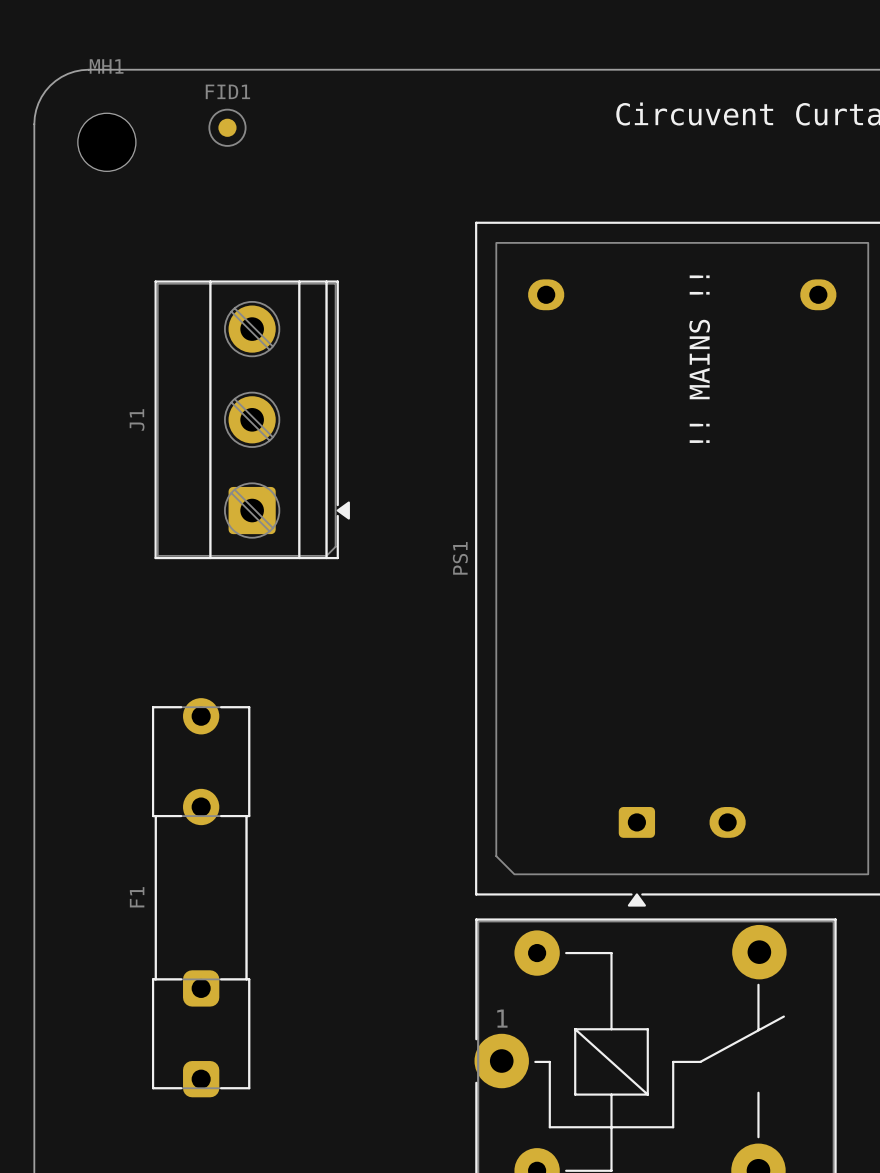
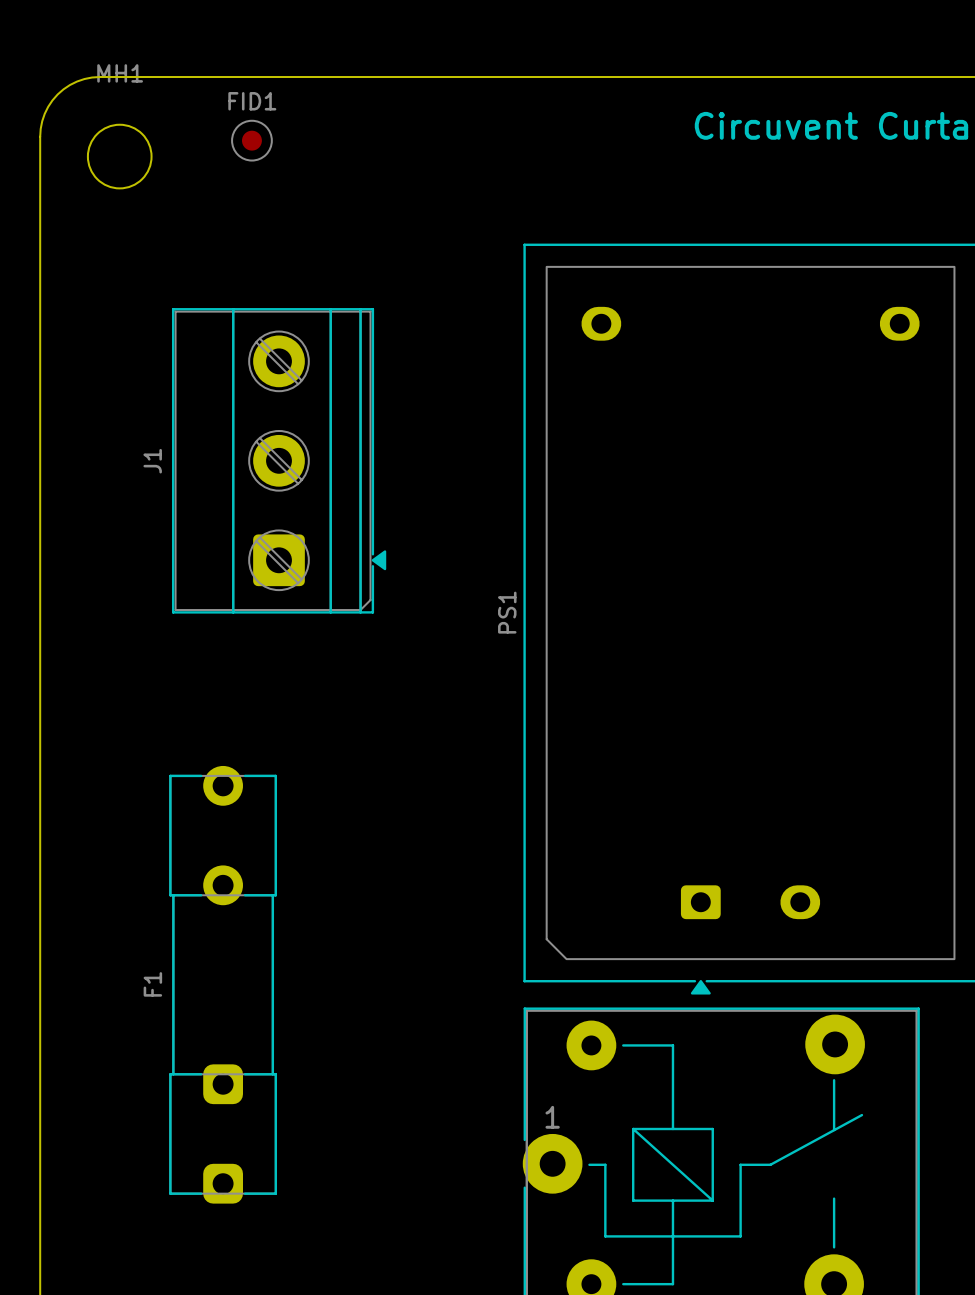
text: !! MAINS !! (699, 359) -> none

